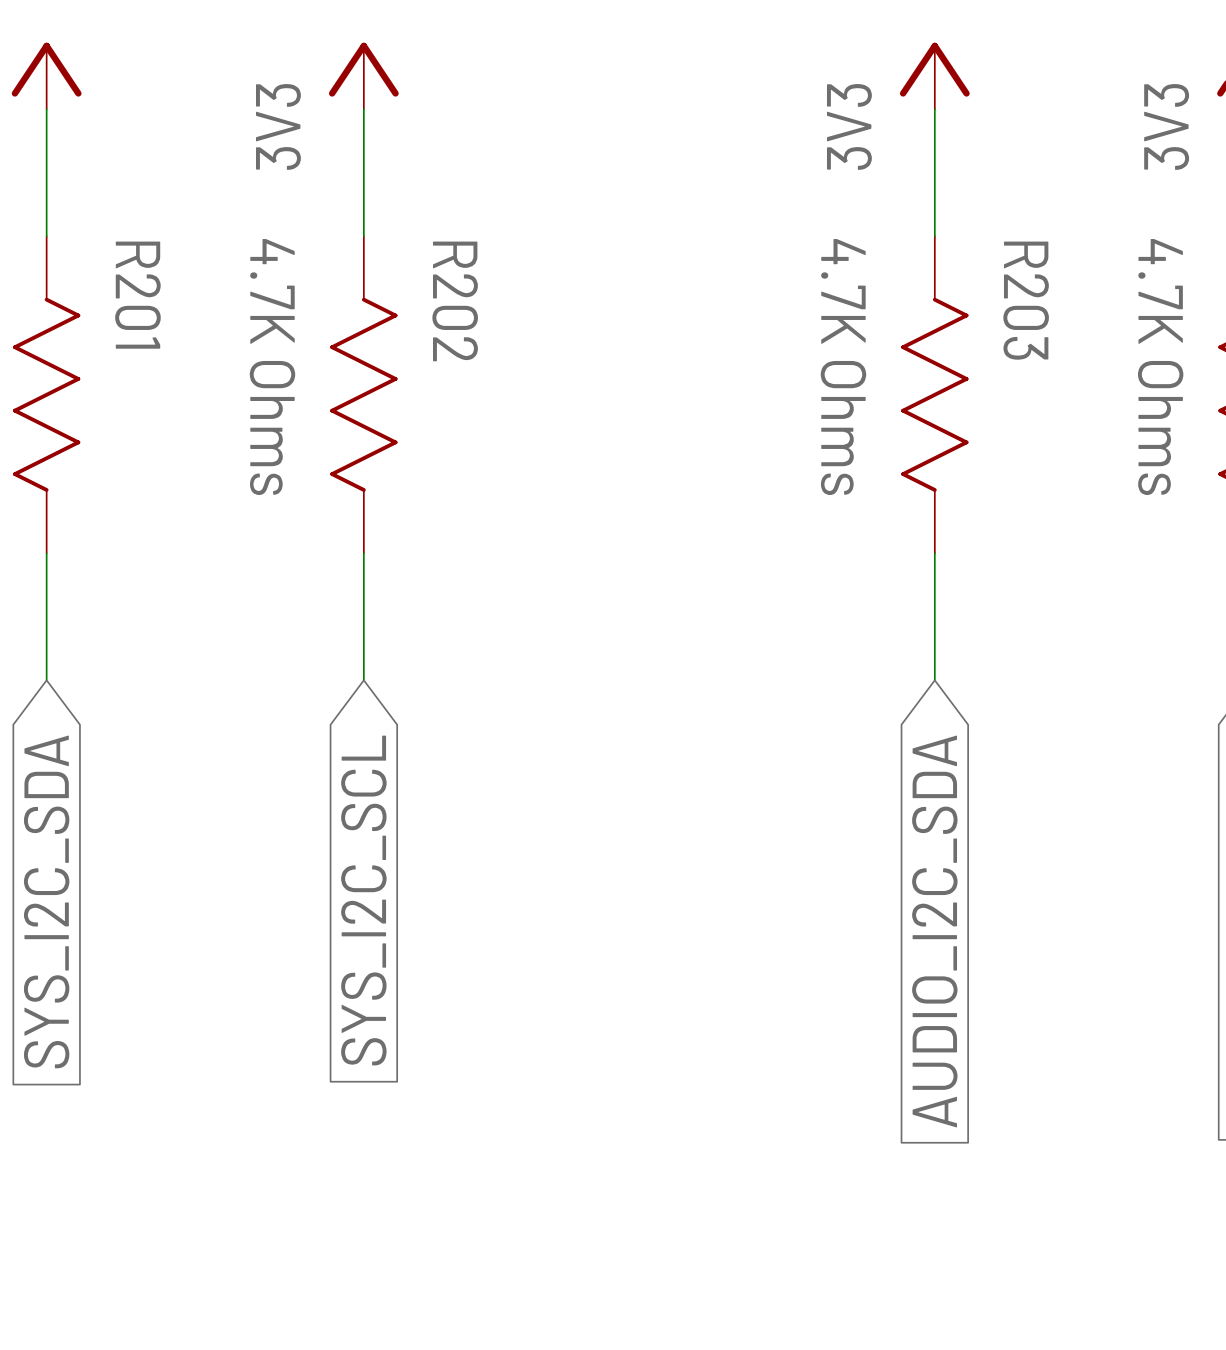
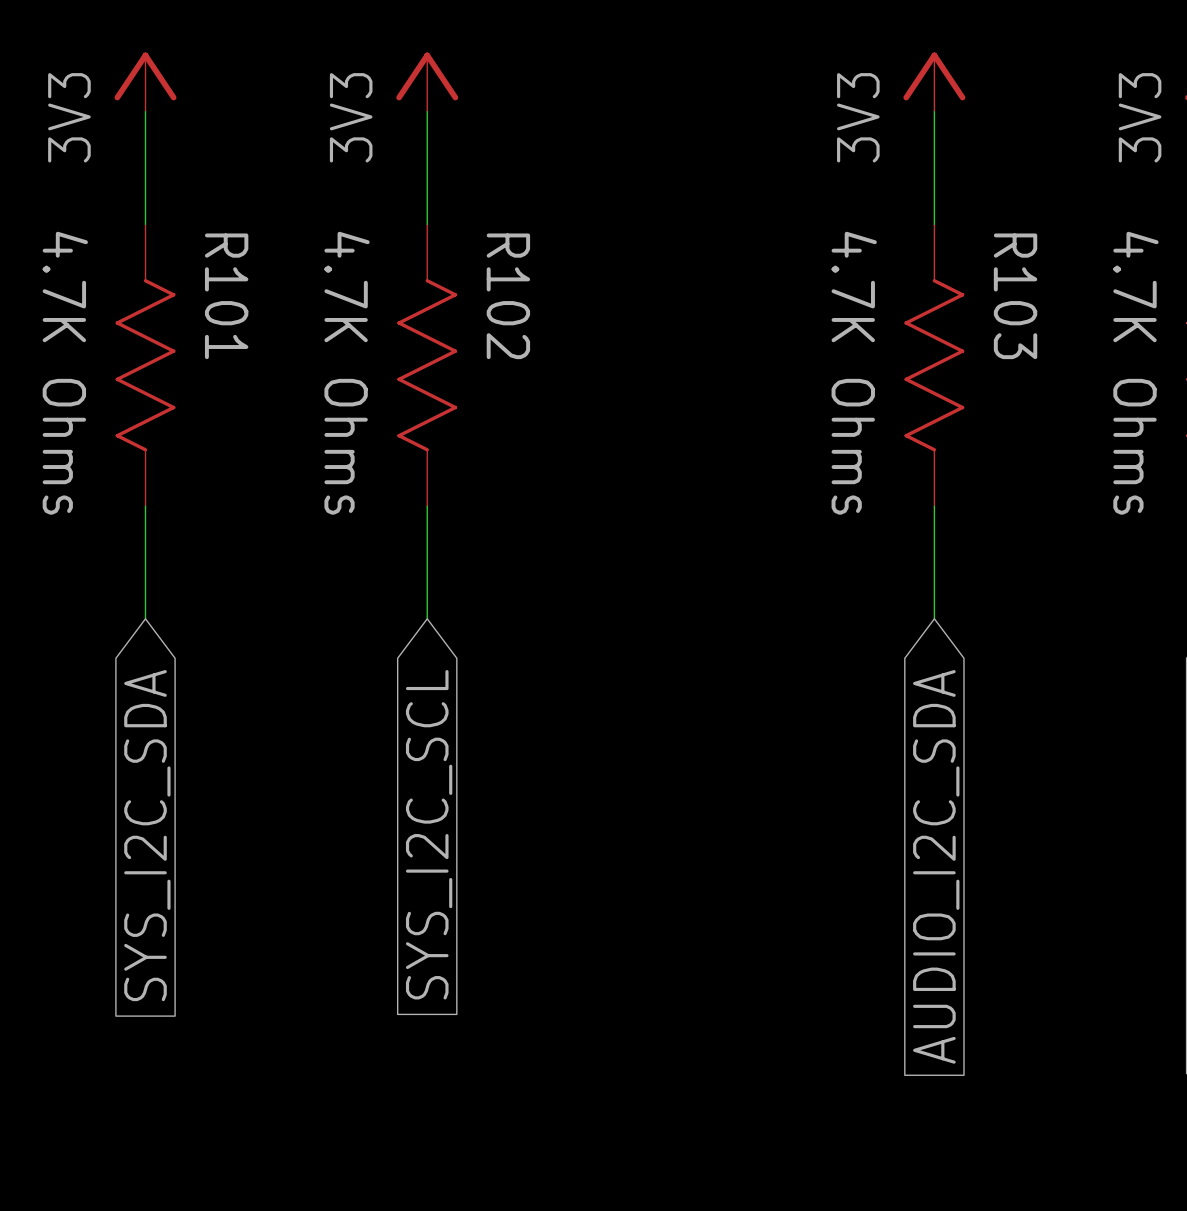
R201 name: R201 (137, 295) -> R101 (226, 296)
R203 name: R203 (1026, 300) -> R103 (1015, 296)
R202 name: R202 (455, 301) -> R102 (508, 296)

